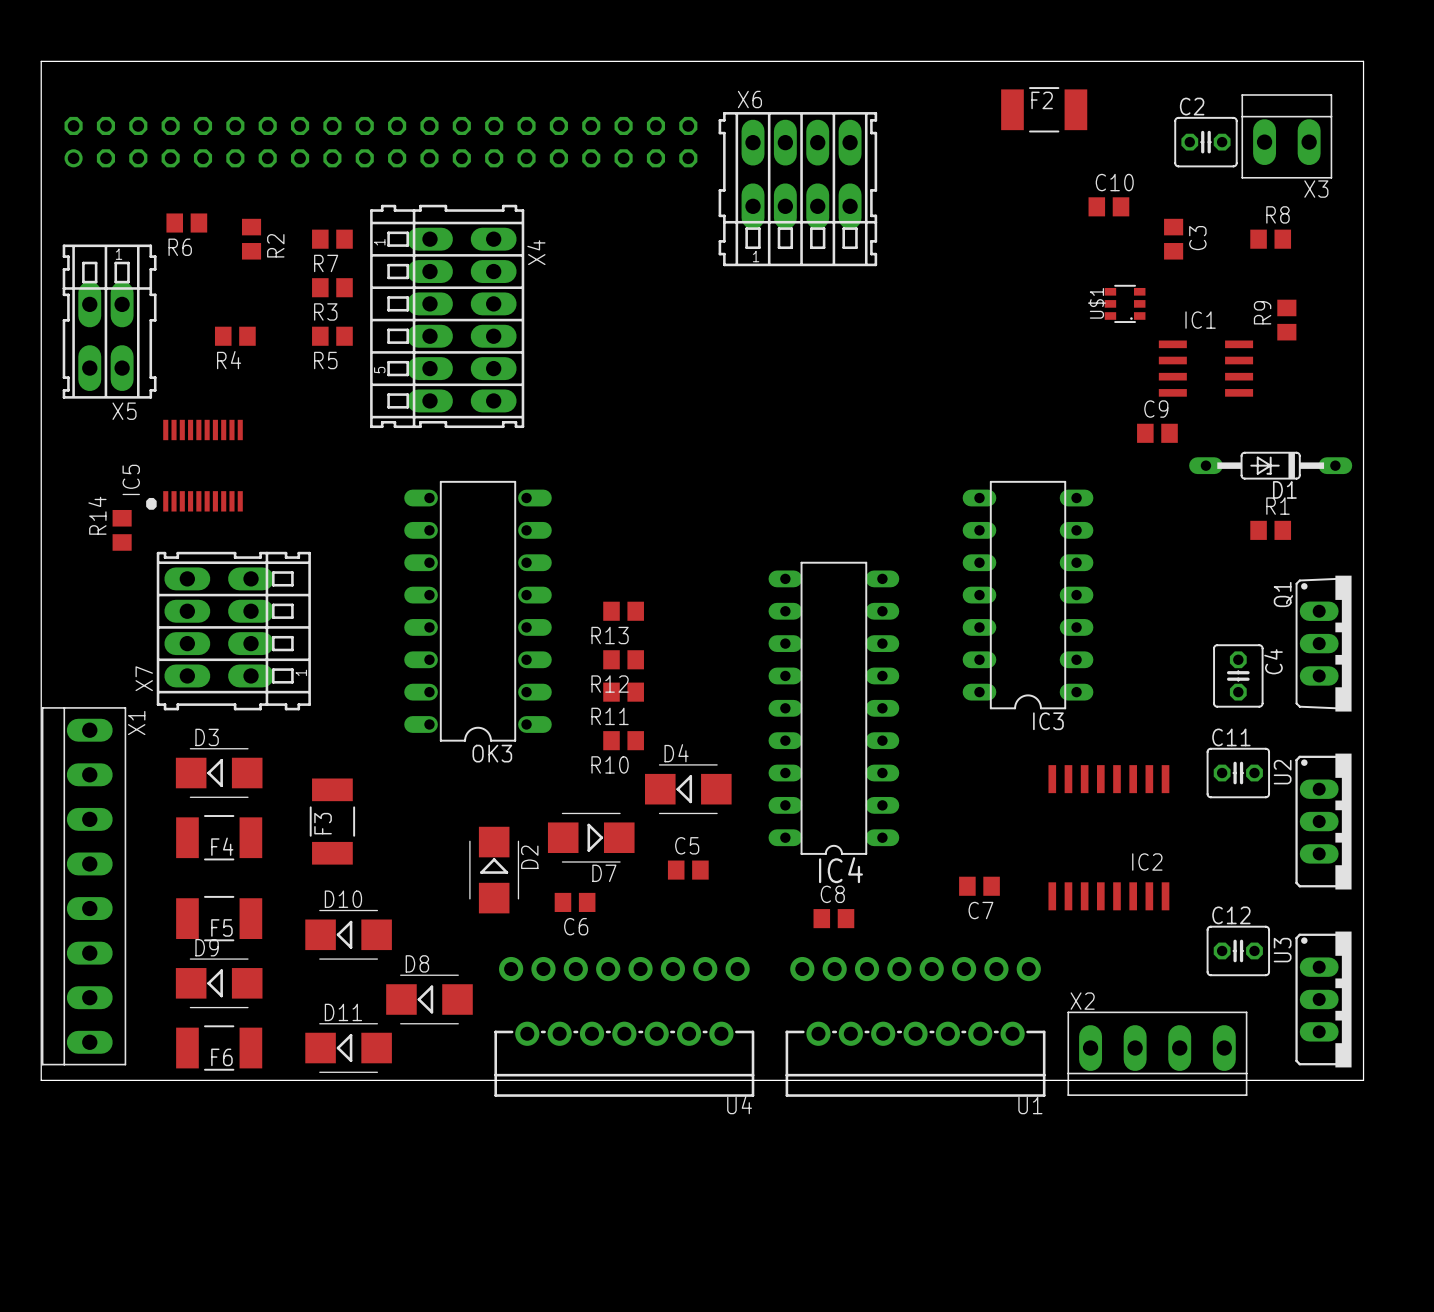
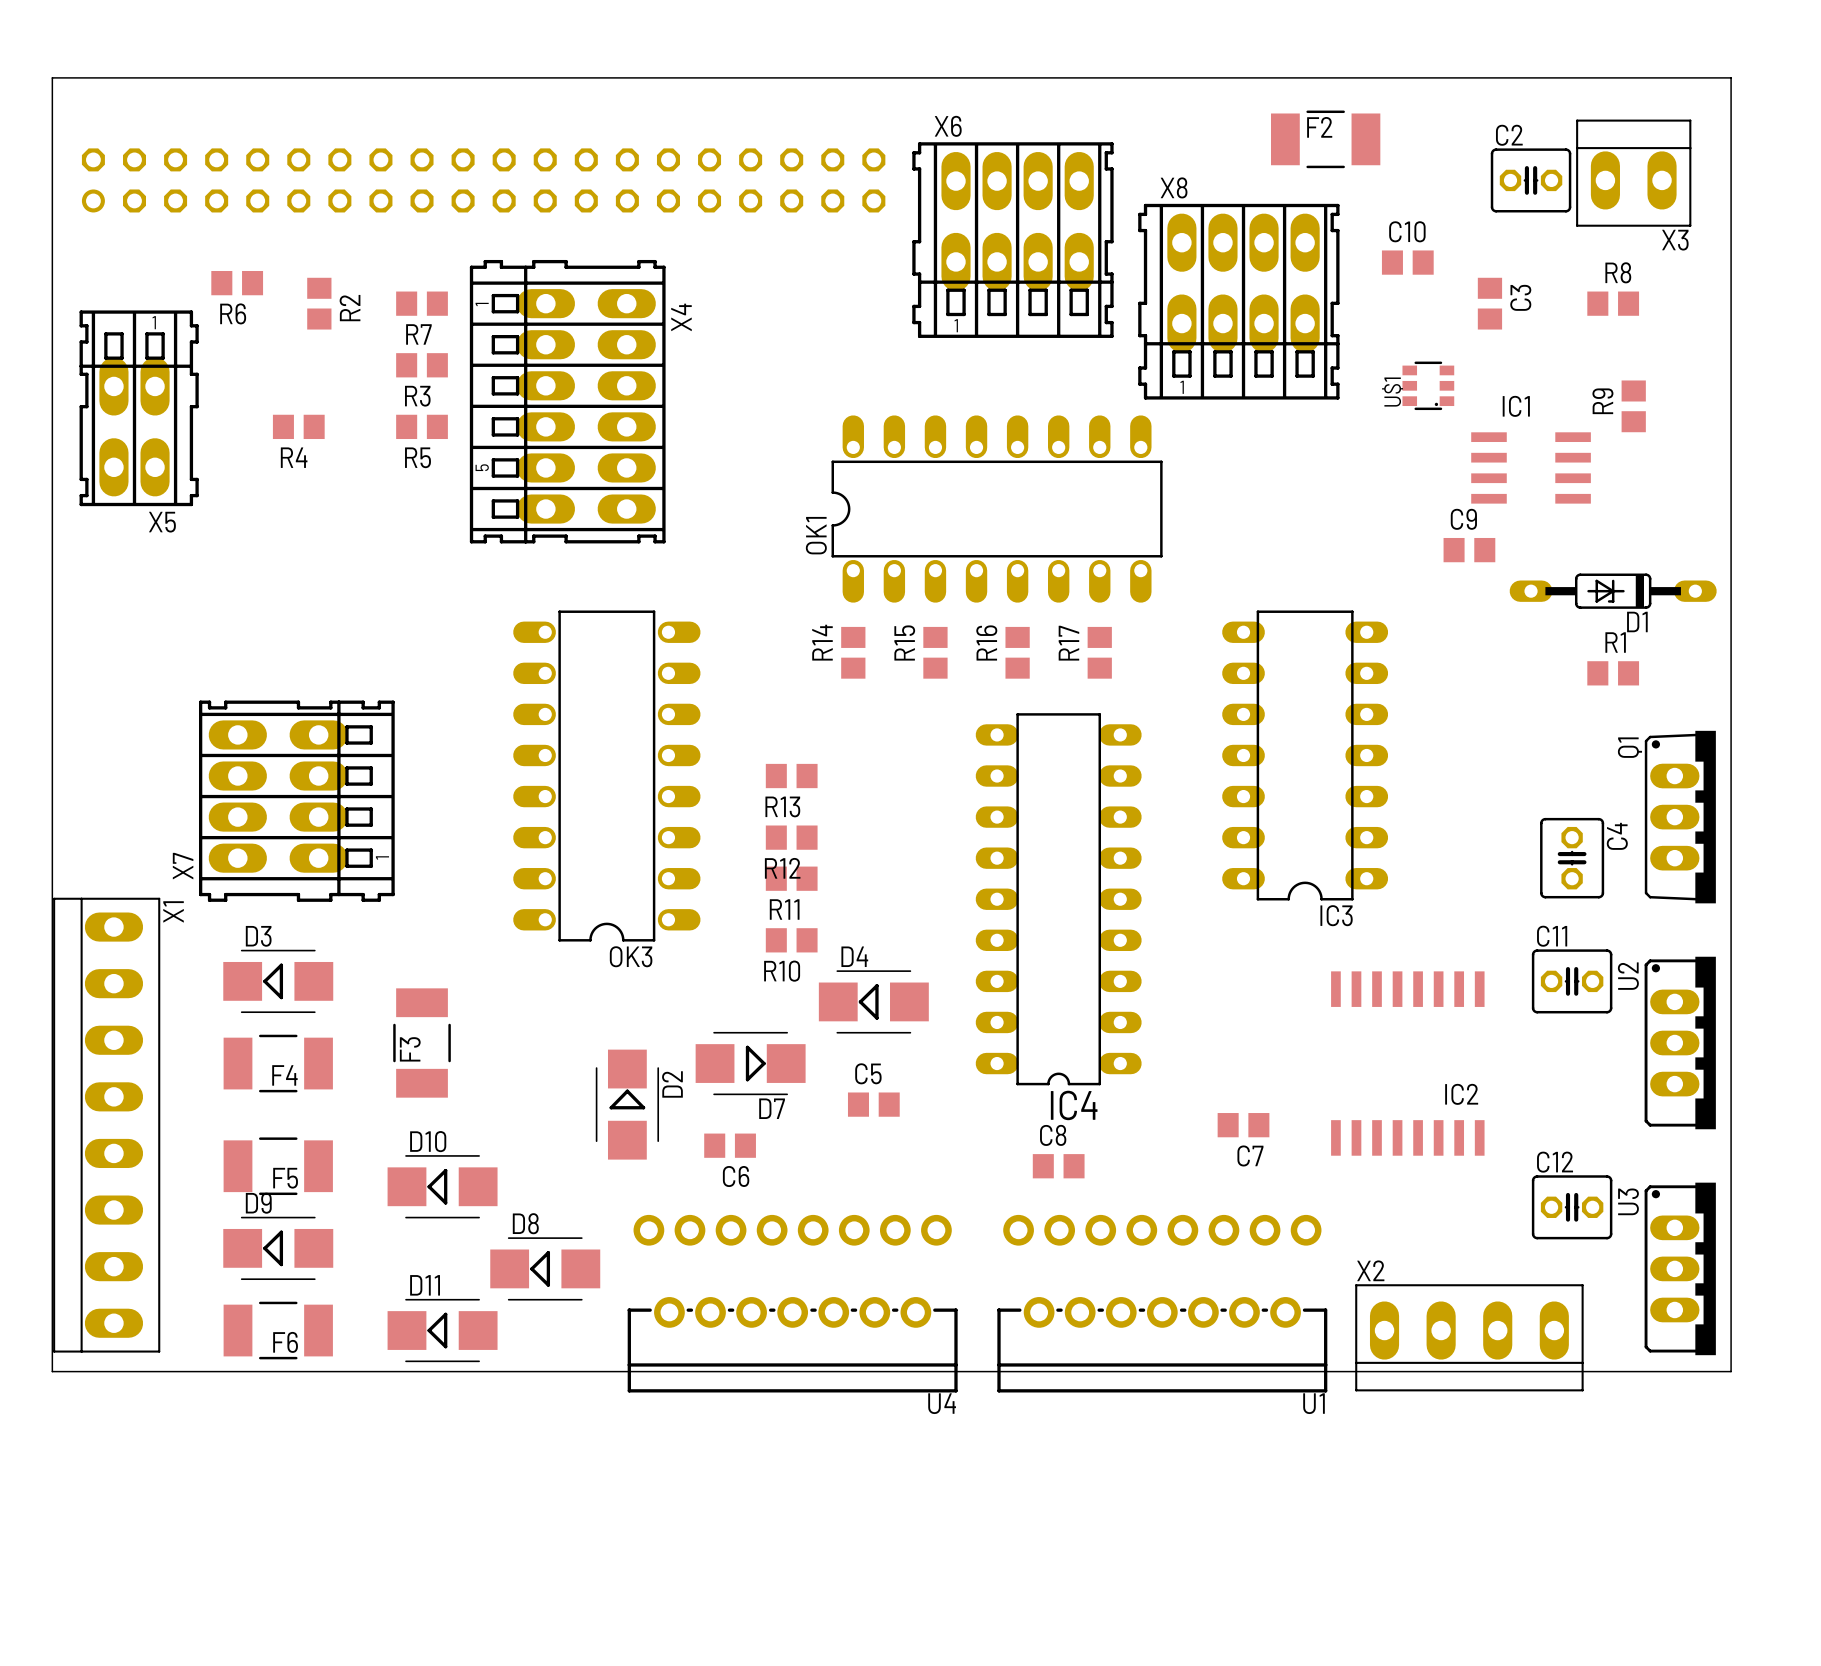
X8: none -> (1238, 301)
OK1: none -> (997, 509)
IC5: (194, 465) -> none
R15: none -> (935, 652)
R16: none -> (1017, 652)
R17: none -> (1099, 652)
R14 position: (122, 530) -> (853, 652)

